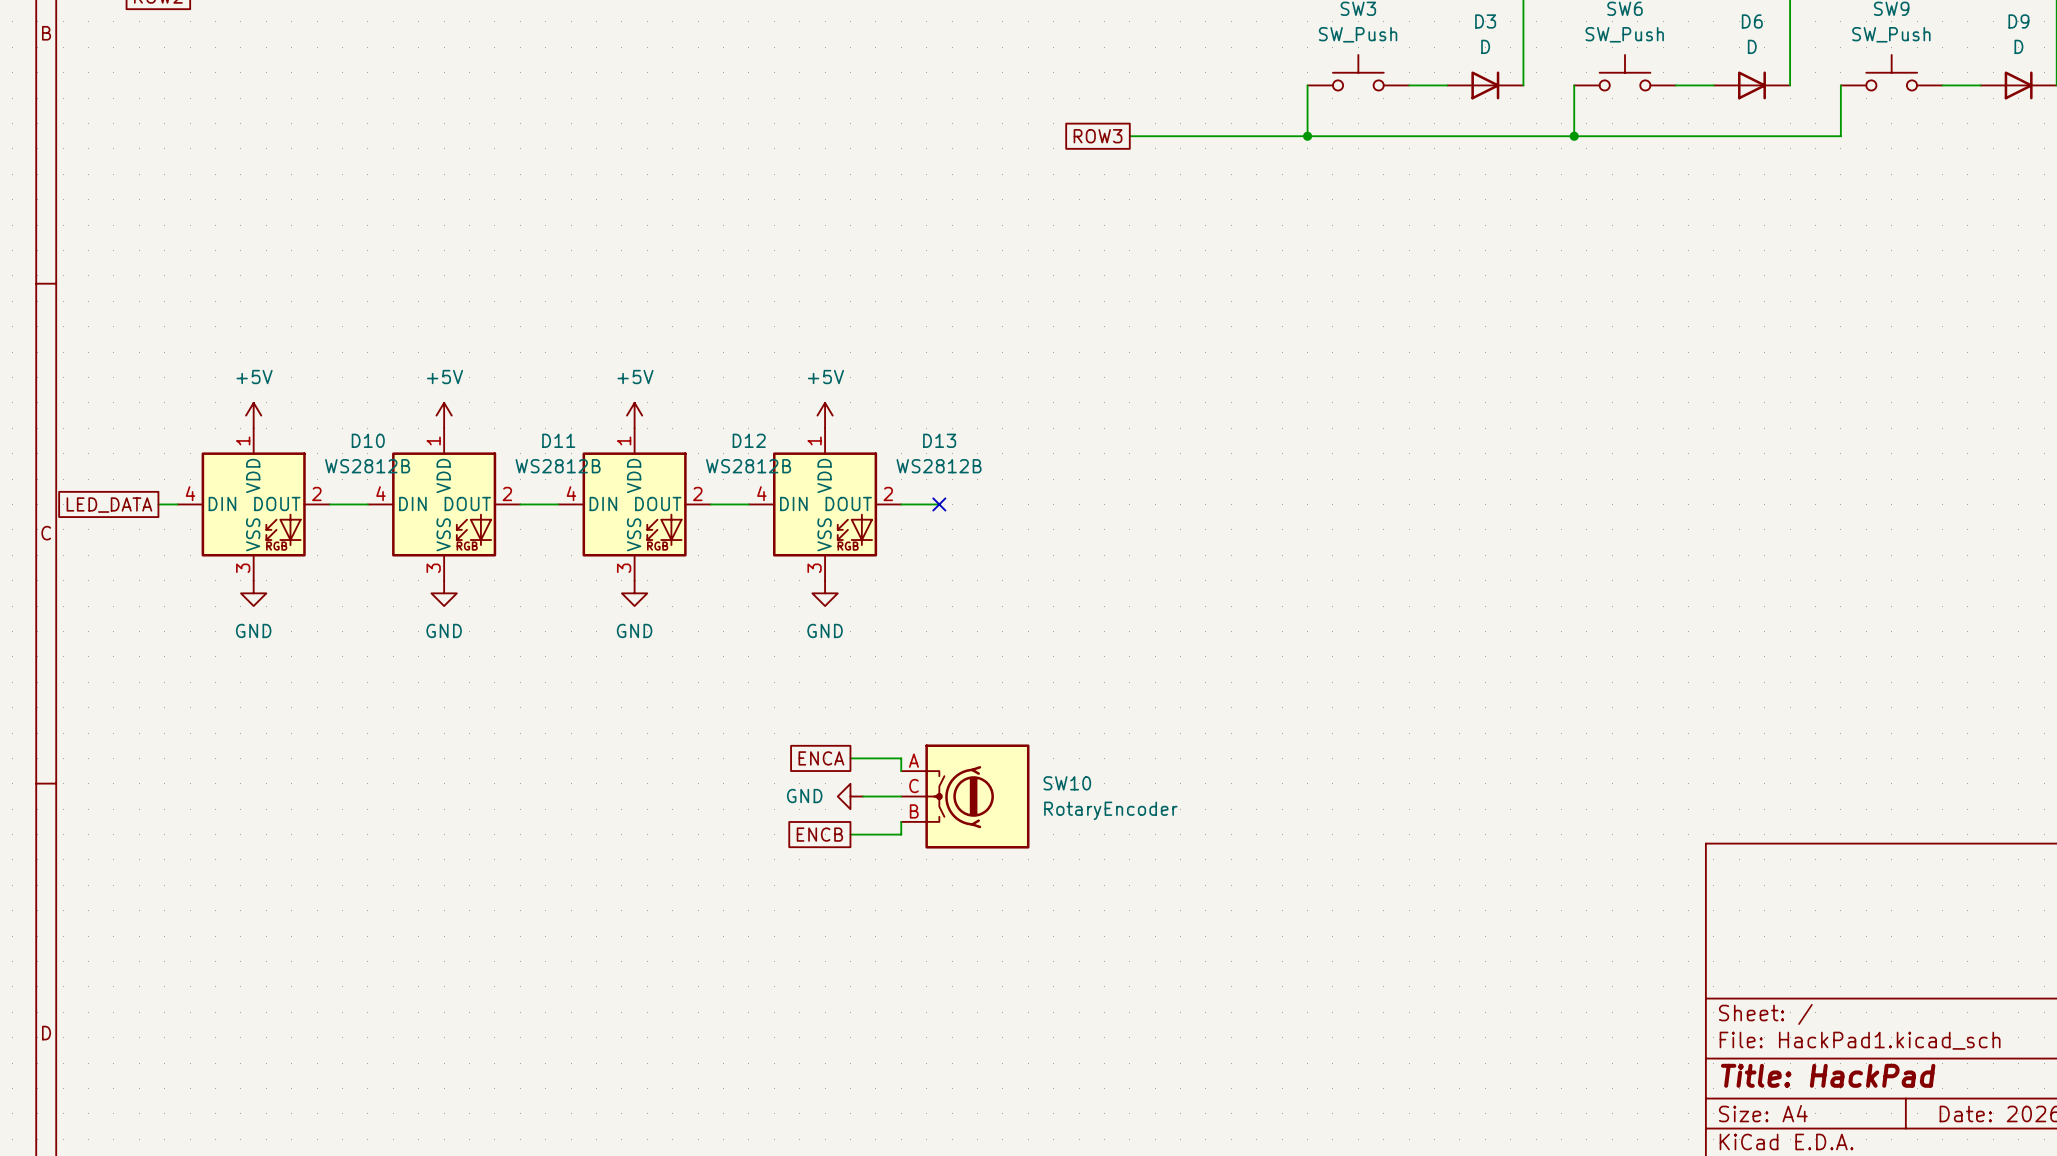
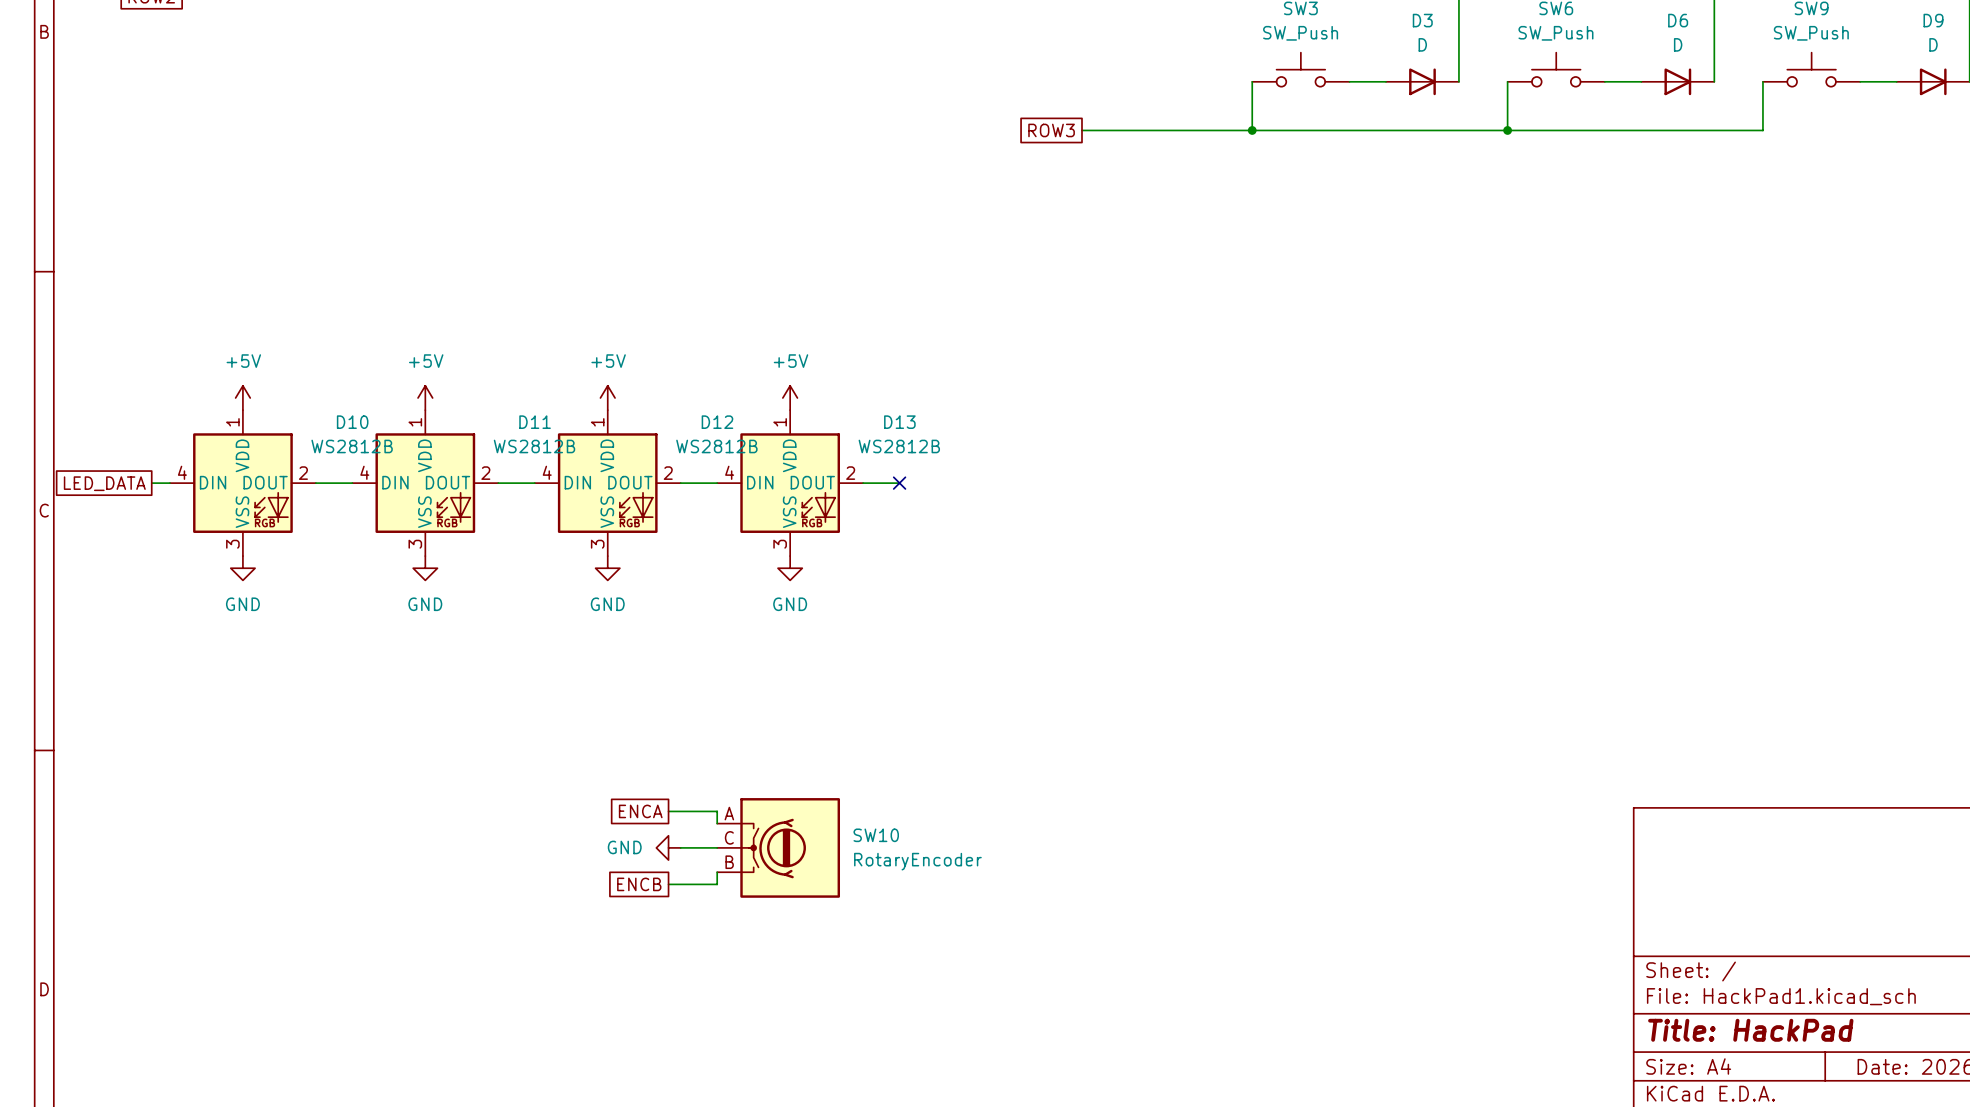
global label position: ENCA (821, 758) -> ENCA (640, 811)
wire: (850, 758) (901, 758) (901, 771) -> (668, 811) (717, 811) (717, 823)
power symbol position: GND (850, 796) -> GND (668, 847)
wire: (863, 796) (901, 796) -> (680, 847) (717, 847)
SW10 position: (965, 796) -> (778, 847)
wire: (901, 821) (901, 834) (850, 834) -> (717, 872) (717, 884) (668, 884)
global label position: ENCB (819, 834) -> ENCB (639, 884)

